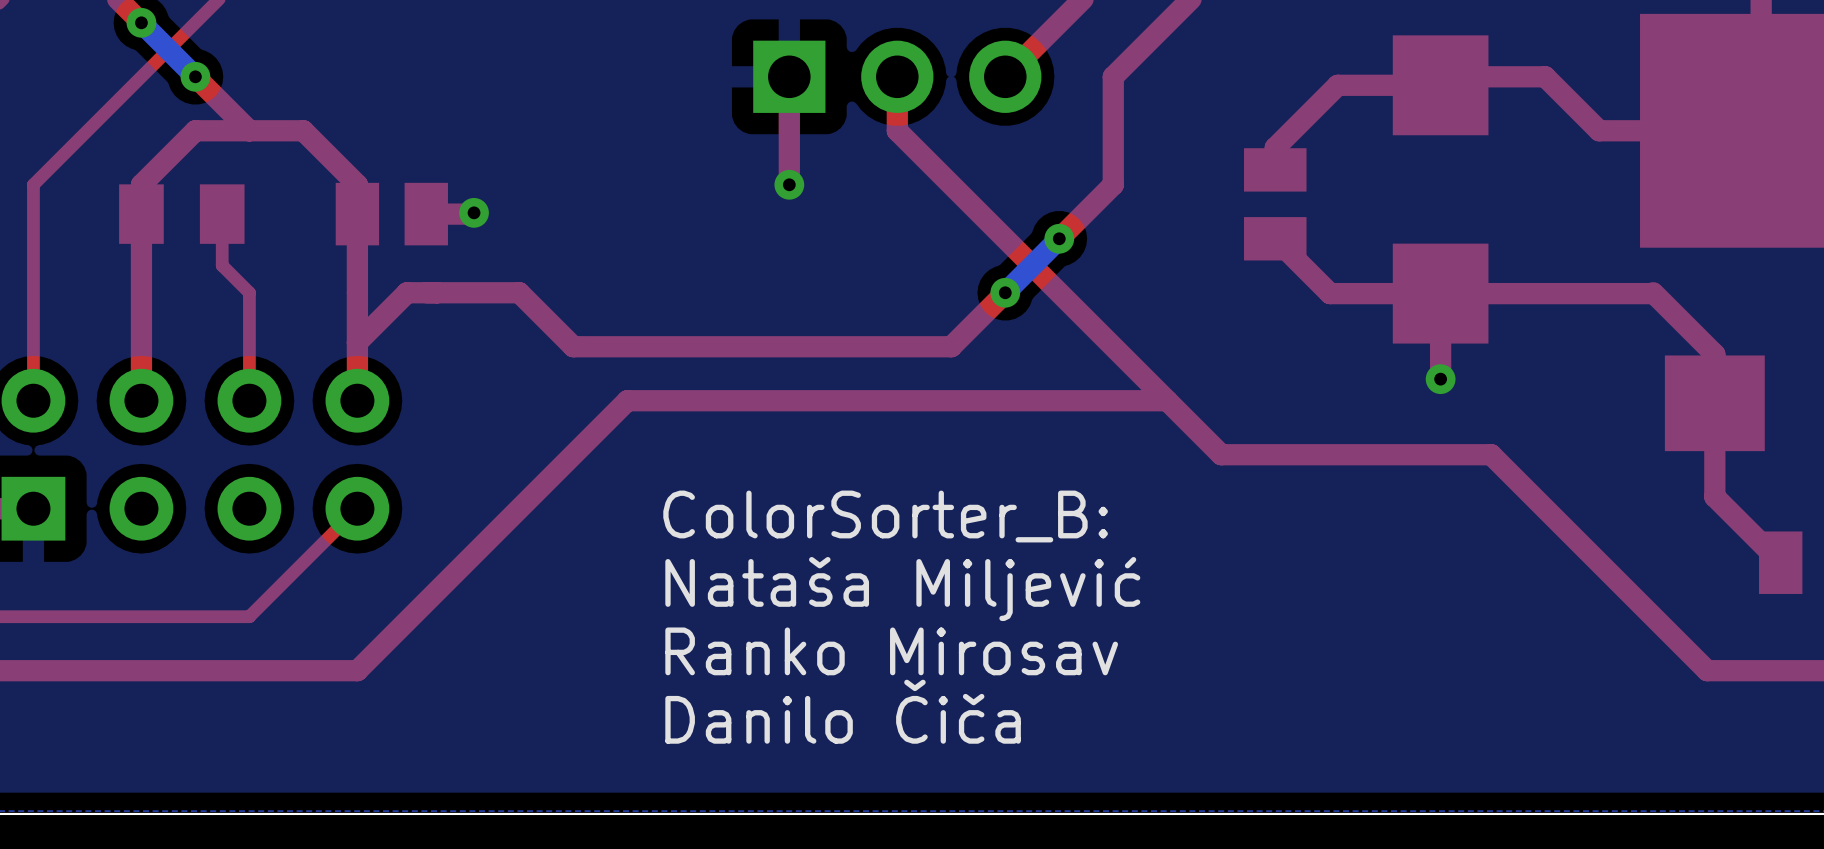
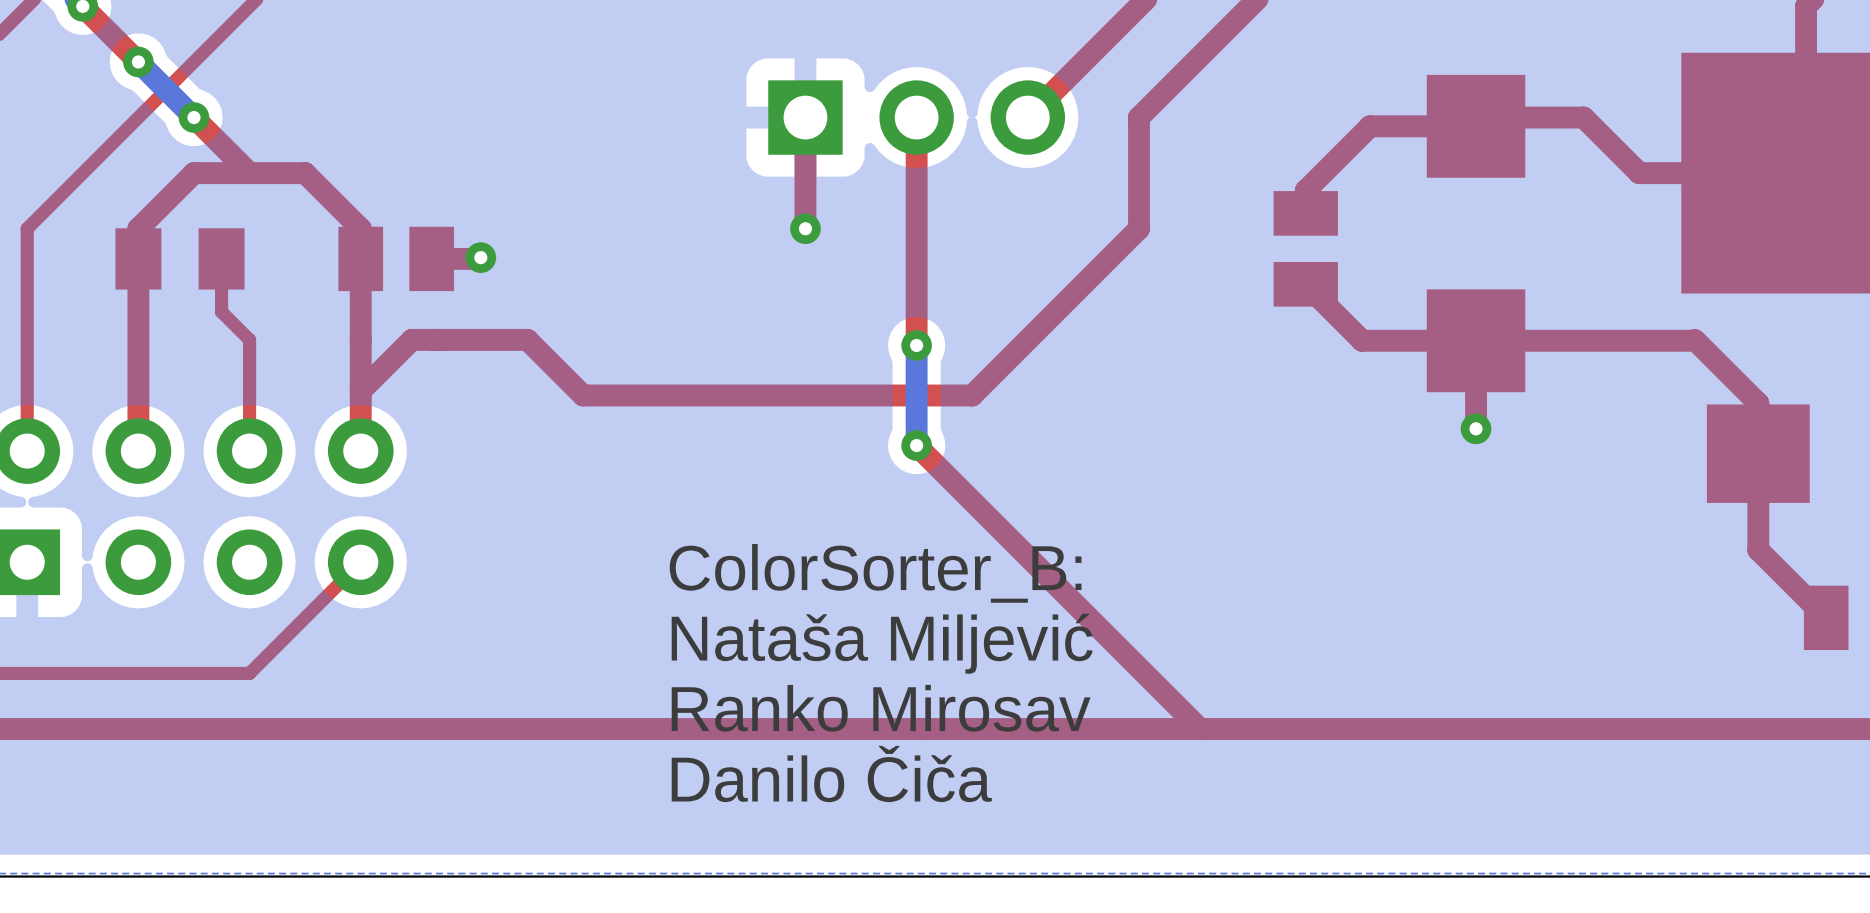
top track: (897, 130) (1221, 454) (1491, 454) (1707, 670) -> (916, 173) (916, 345)
top track: none -> (1083, 284) (1027, 339)
bottom track: (1059, 238) (1005, 292) -> none
via: (1059, 238) -> none
via: (1005, 292) -> none
bottom track: none -> (916, 345) (916, 445)
via: none -> (916, 345)
top track: none -> (916, 445) (1200, 729)
via: none -> (916, 445)
top track: (1167, 400) (627, 400) (357, 670) -> (1750, 729) (360, 729)

